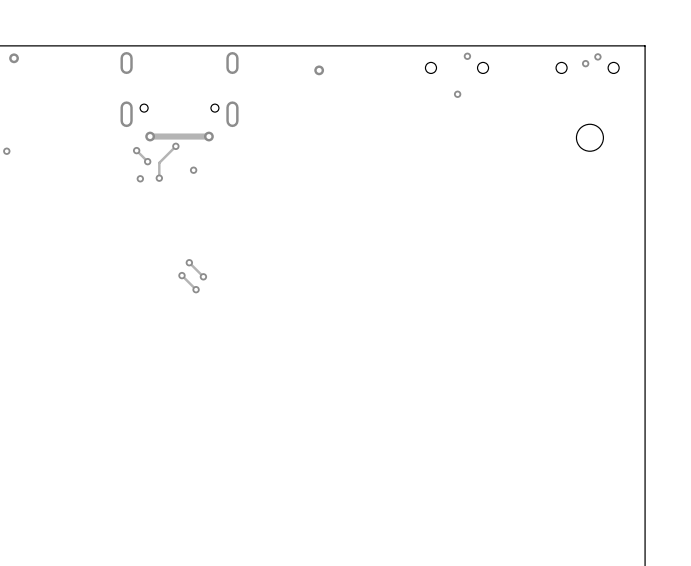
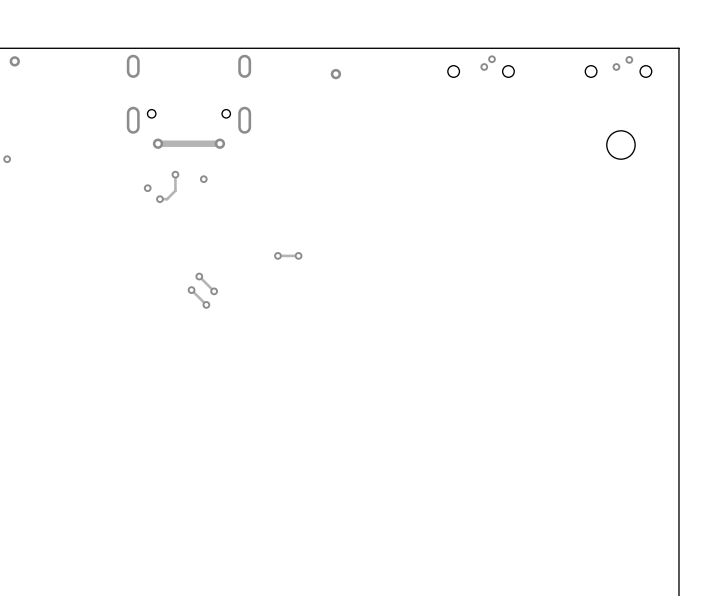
via position: (457, 94) -> (484, 66)
track: (175, 146) (159, 162) (159, 178) -> none
via: (175, 146) -> none
track: (136, 150) (147, 161) -> none
via: (136, 150) -> none
via: (147, 161) -> none
track: none -> (175, 174) (175, 190) (167, 199) (159, 199)
via: none -> (175, 174)
via: (159, 178) -> none
via: none -> (159, 199)
track: none -> (277, 255) (298, 255)
via: none -> (277, 255)
via: none -> (298, 255)

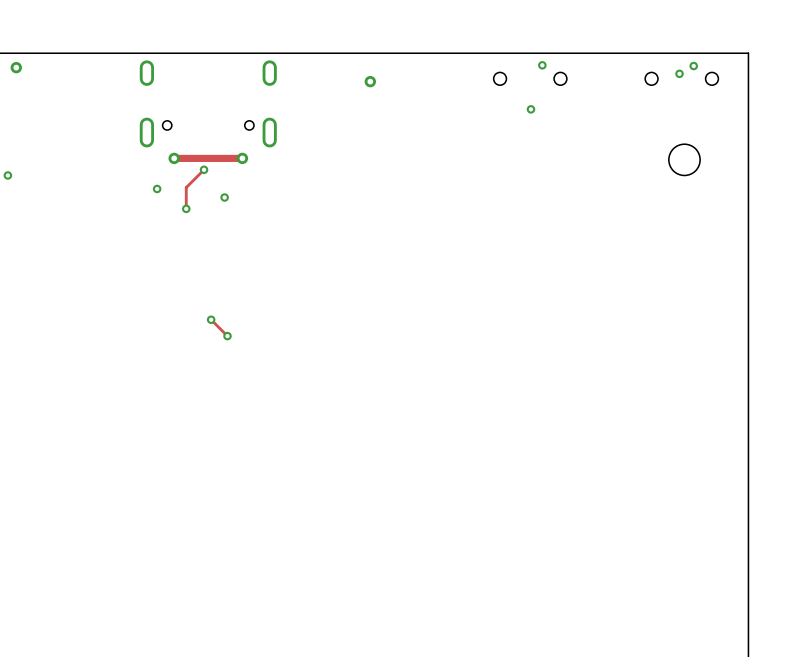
via position: (484, 66) -> (530, 109)
track: none -> (204, 169) (186, 187) (186, 208)
via: none -> (204, 169)
via: none -> (157, 188)
track: (175, 174) (175, 190) (167, 199) (159, 199) -> none
via: (175, 174) -> none
via: (147, 188) -> none
via: none -> (186, 208)
via: (159, 199) -> none
track: (277, 255) (298, 255) -> none
via: (277, 255) -> none
via: (298, 255) -> none
track: (199, 276) (214, 291) -> none
via: (199, 276) -> none
via: (214, 291) -> none

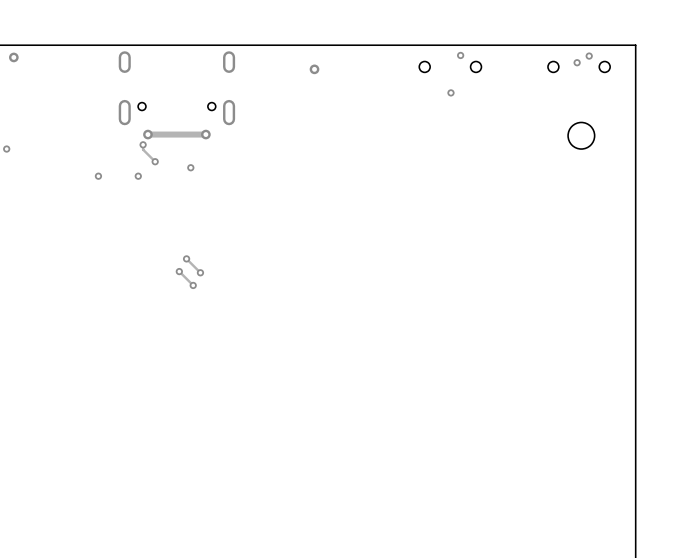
track: (204, 169) (186, 187) (186, 208) -> none
via: (204, 169) -> none
track: none -> (143, 144) (143, 149) (155, 161)
via: none -> (143, 144)
via: (157, 188) -> none
via: none -> (155, 161)
via: none -> (98, 176)
via: none -> (138, 176)
via: (186, 208) -> none
track: none -> (186, 258) (200, 272)
via: none -> (186, 258)
via: none -> (200, 272)

